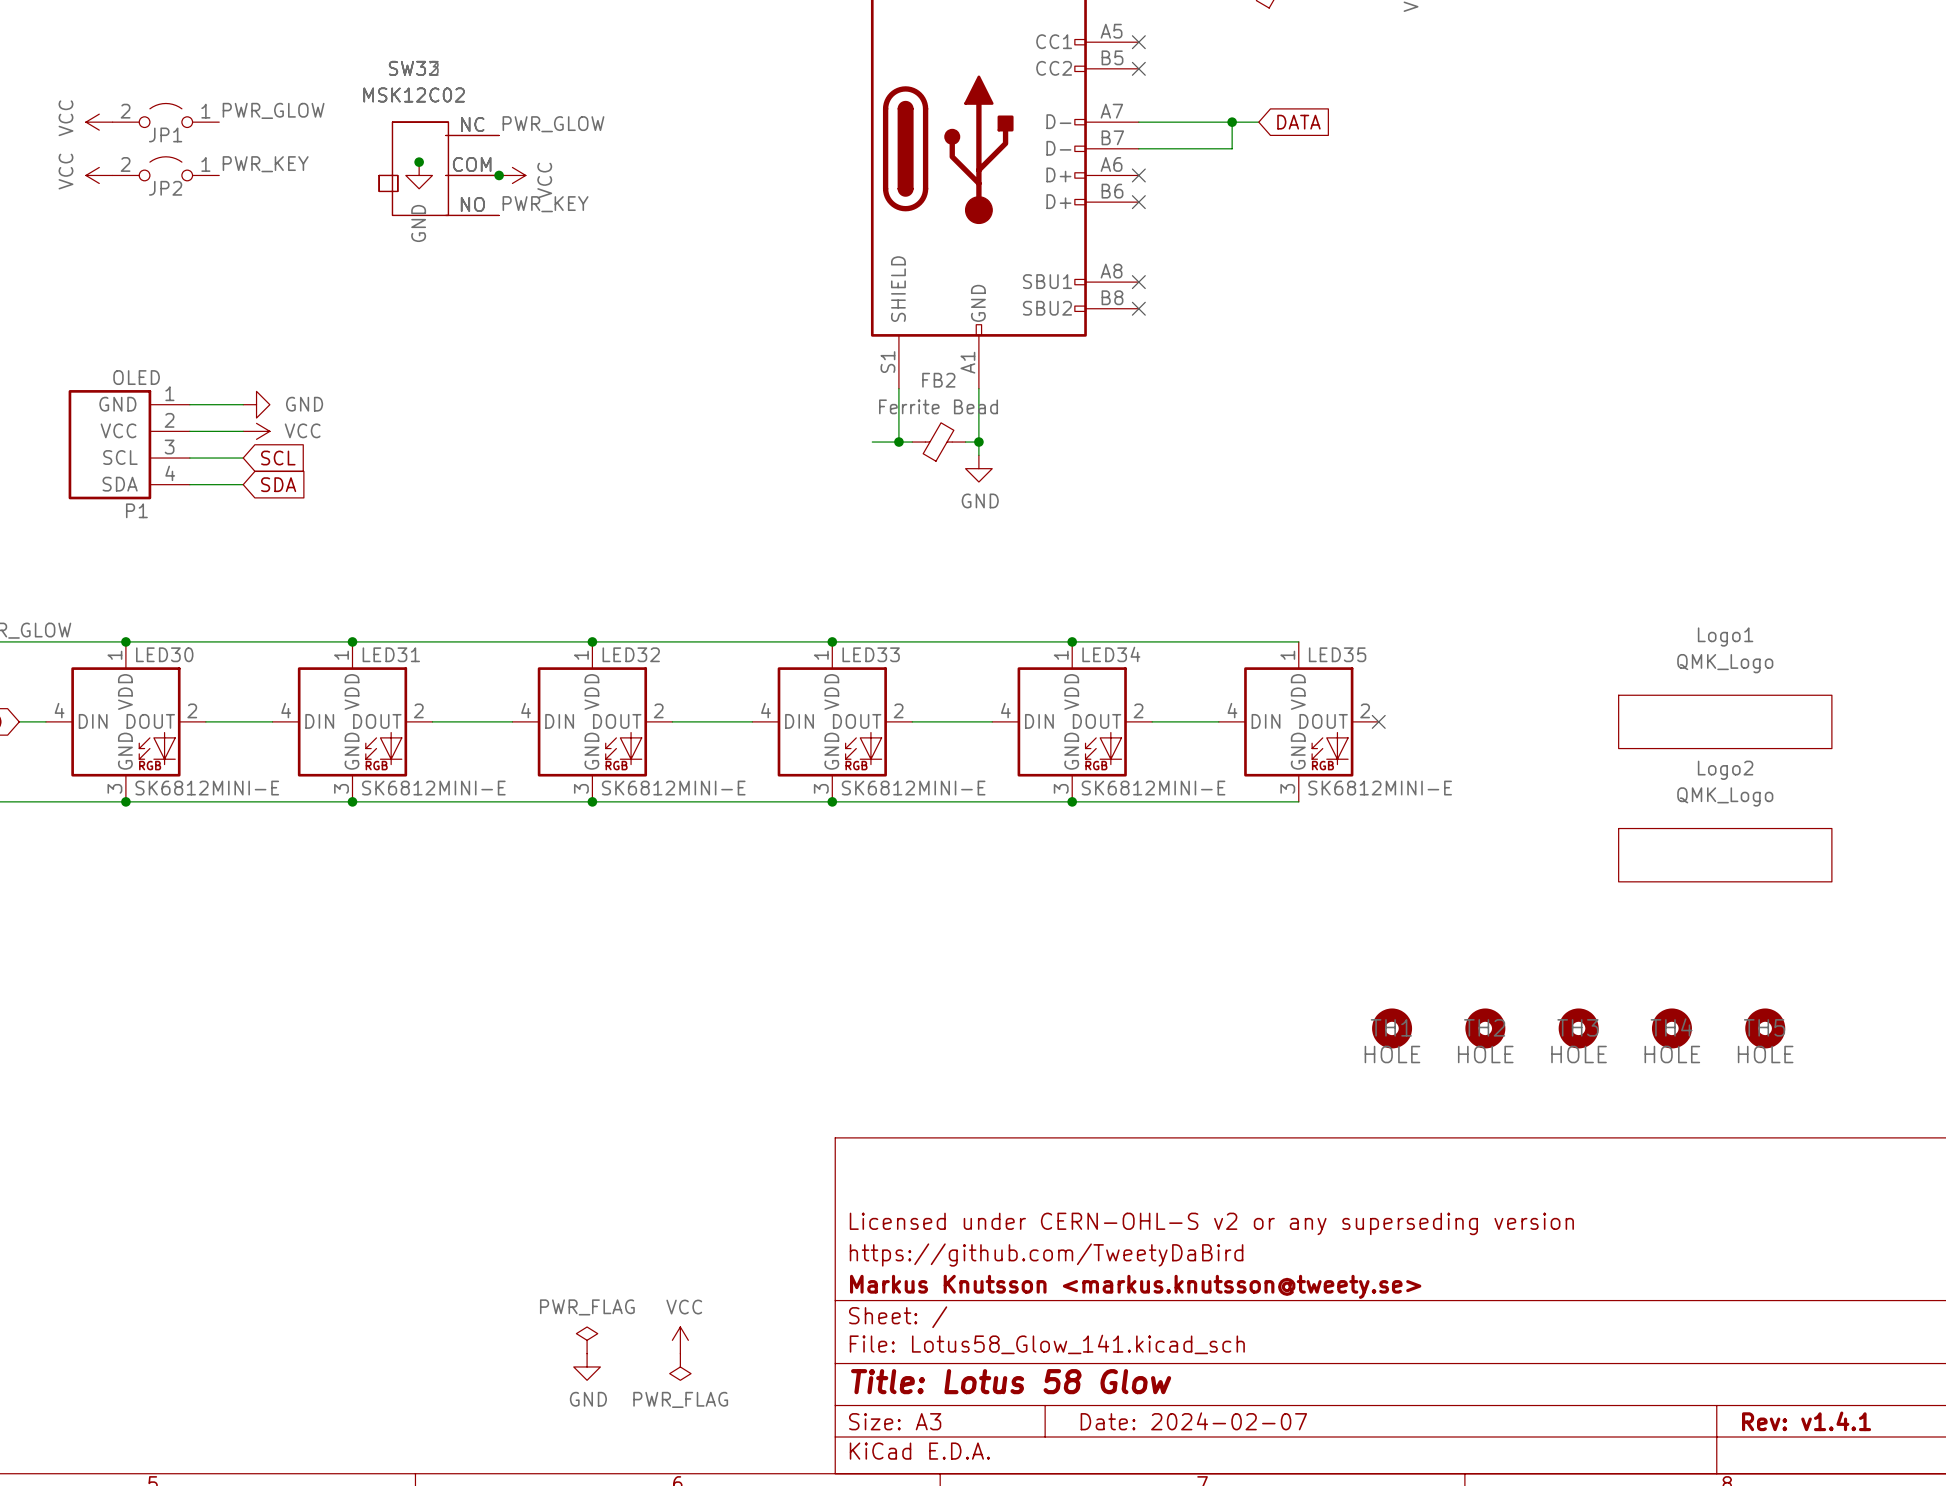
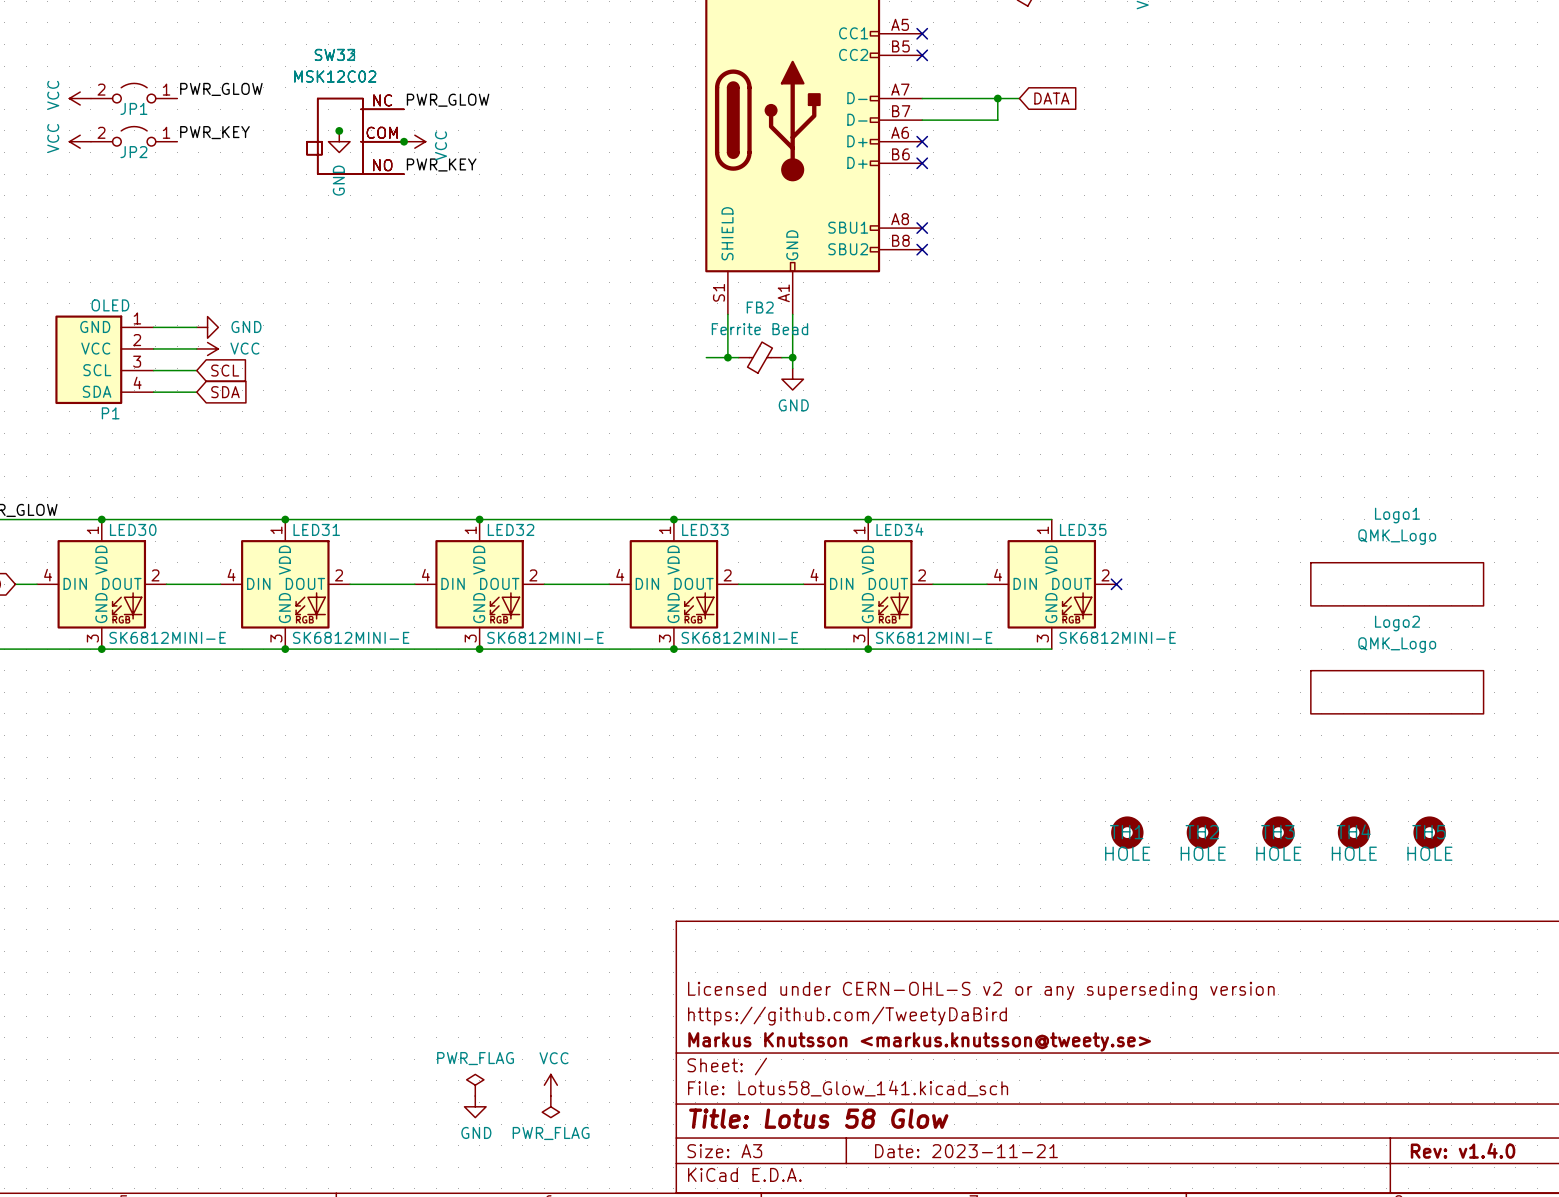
title block: Date: 2024-02-07 (1193, 1421) -> Date: 2023-11-21 (966, 1151)
title block: Rev: v1.4.1 (1806, 1421) -> Rev: v1.4.0 (1463, 1150)

